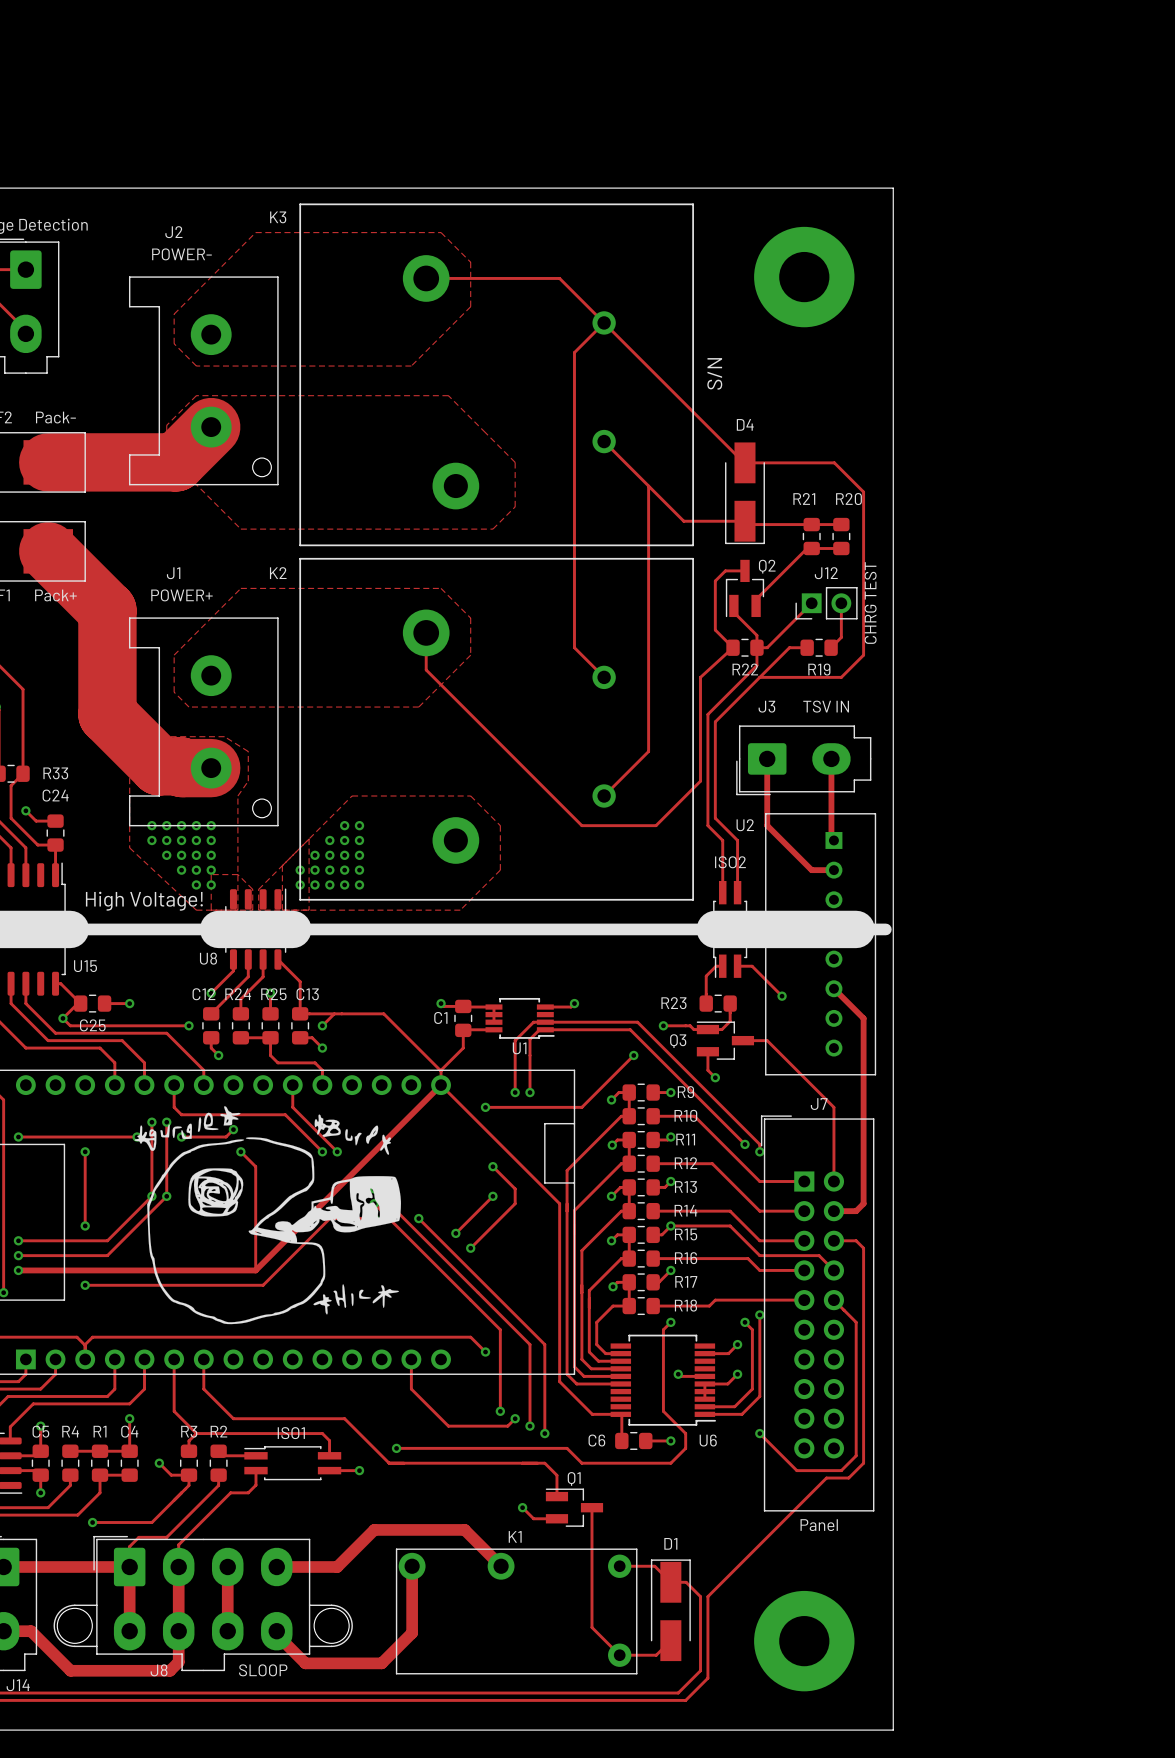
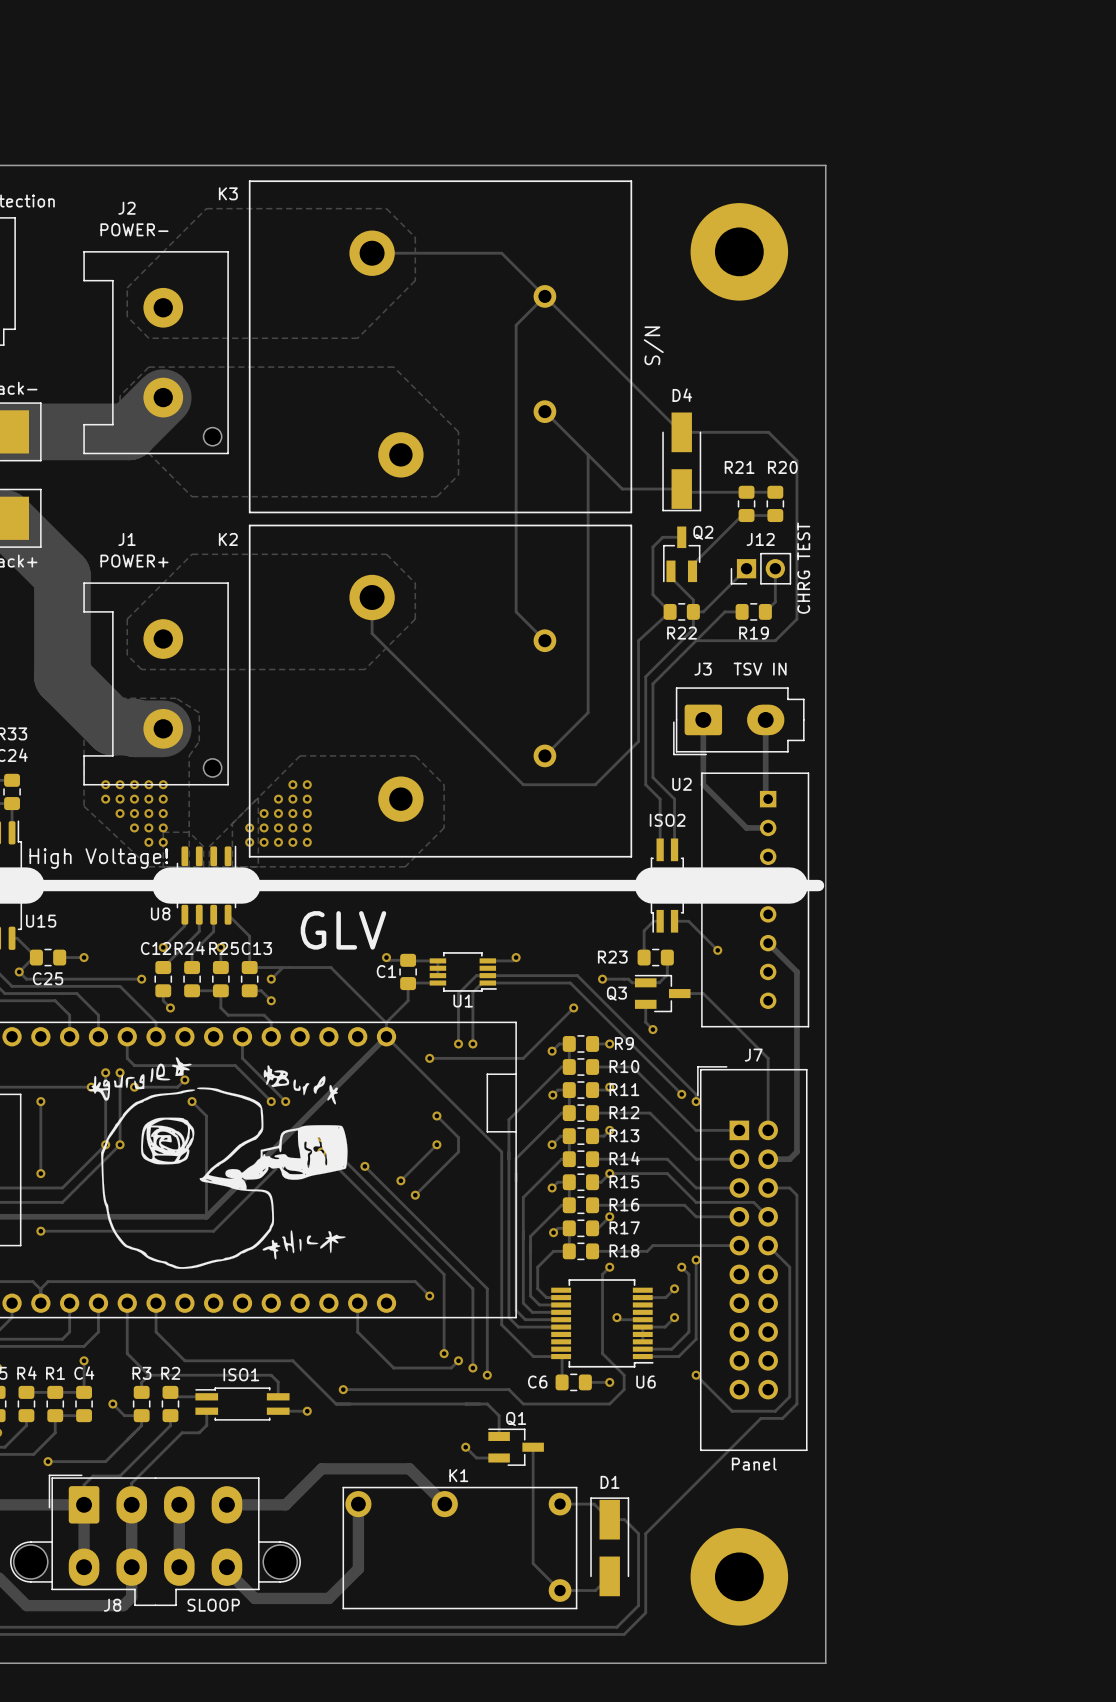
text: none -> GLV (343, 930)

